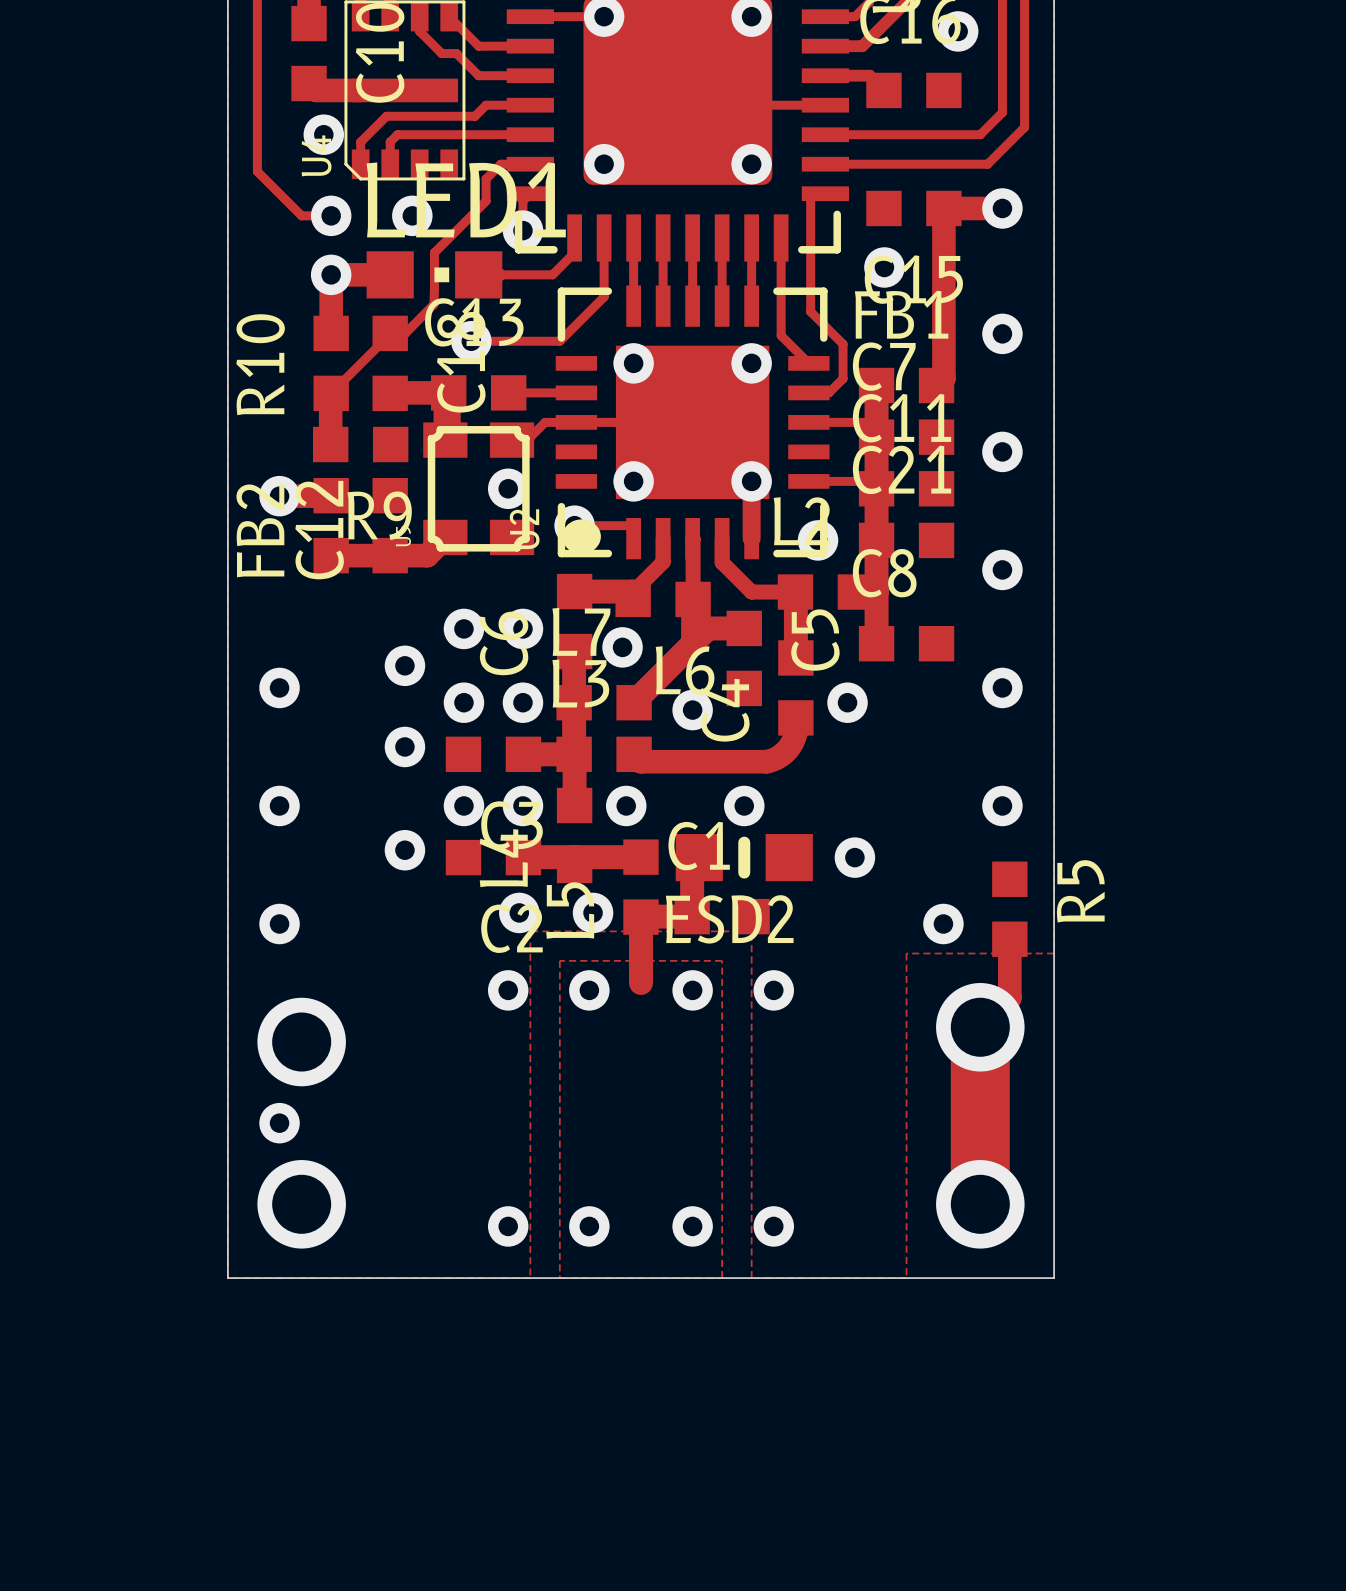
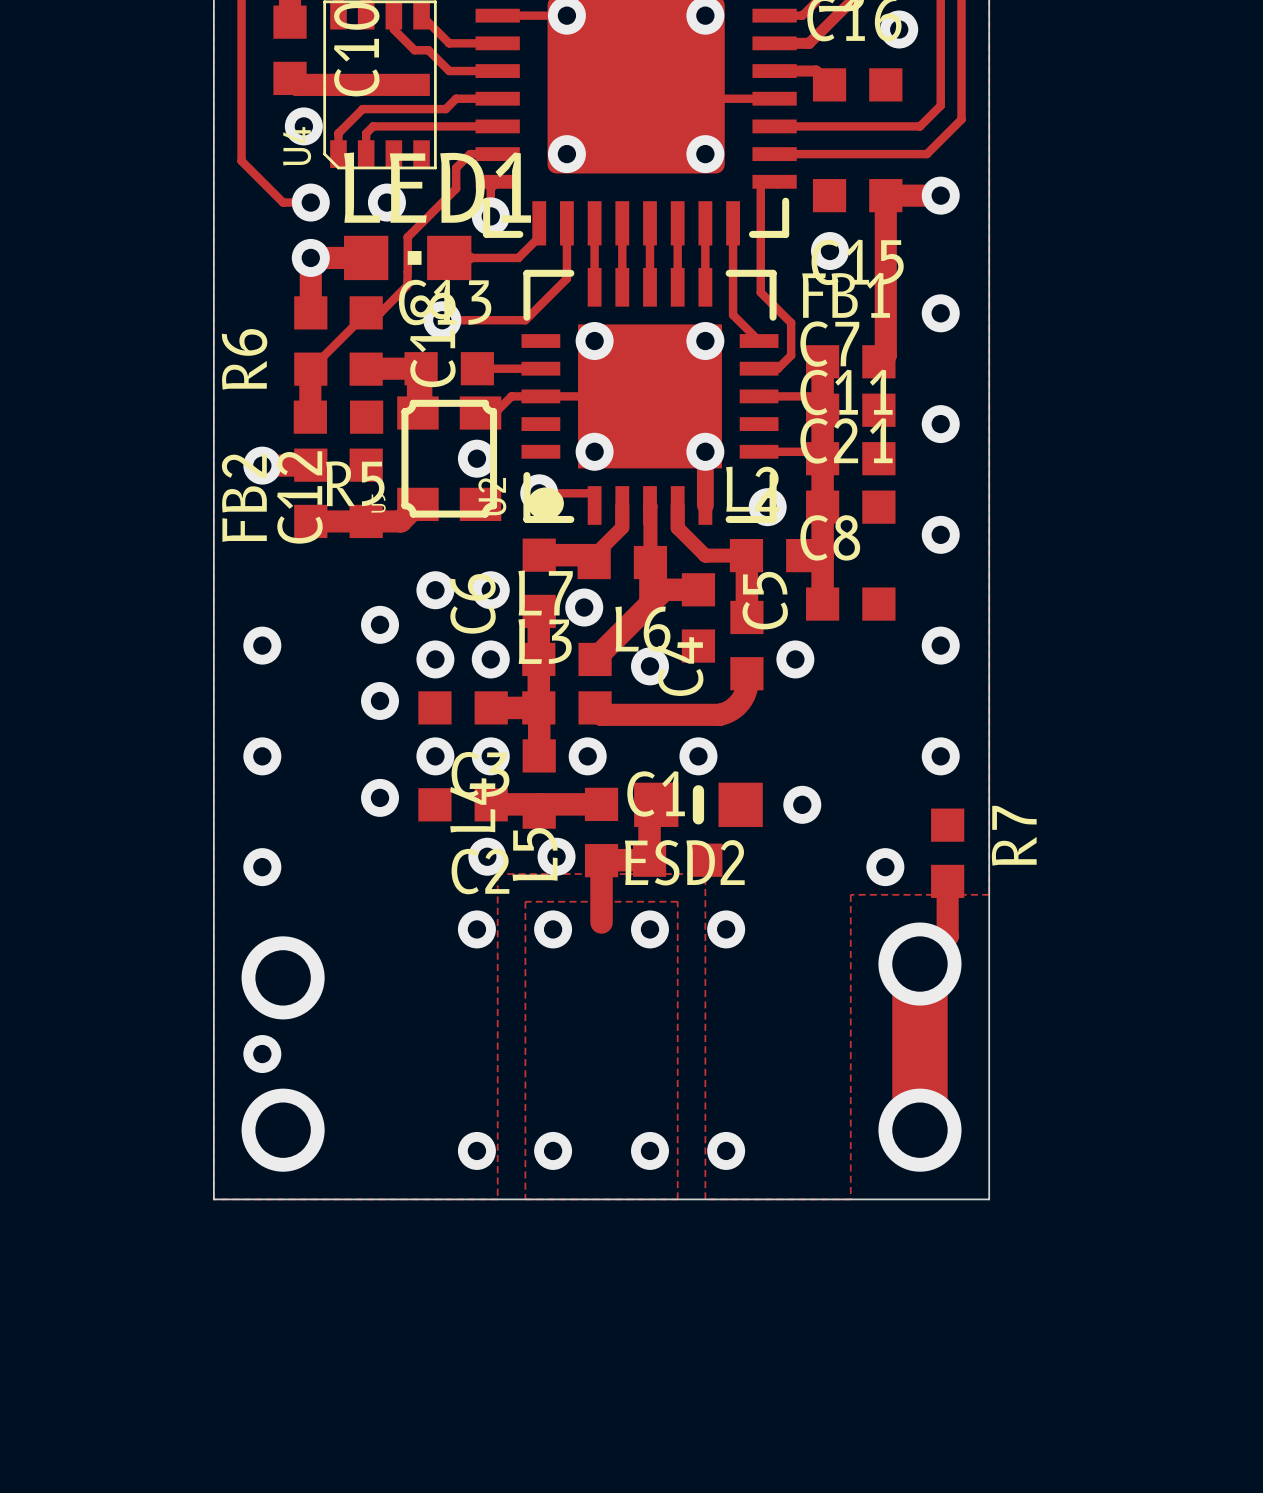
R10 name: R10 (260, 364) -> R6 (244, 359)
R9 name: R9 (379, 515) -> R5 (355, 483)
R5 name: R5 (1080, 891) -> R7 (1014, 835)

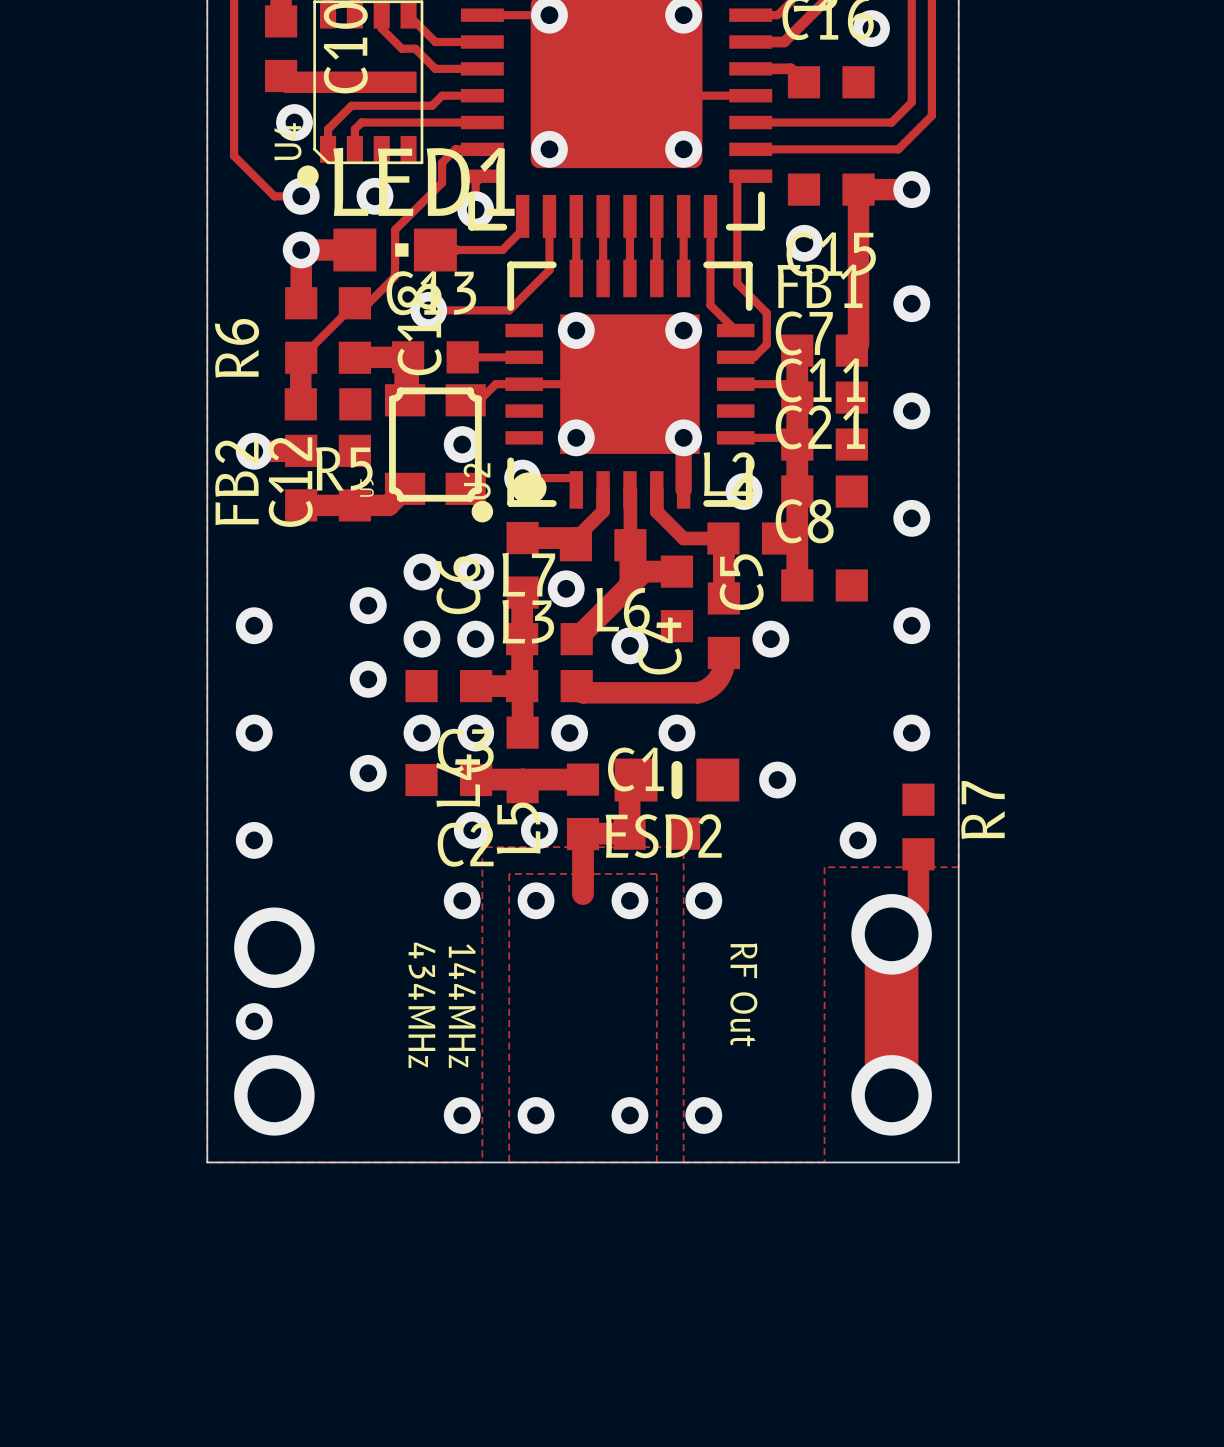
drawing: none -> [297, 165, 319, 187]
drawing: none -> [471, 500, 494, 523]
text: none -> RF Out (743, 994)
text: none -> 434MHz (421, 1005)
text: none -> 144MHz (462, 1006)

